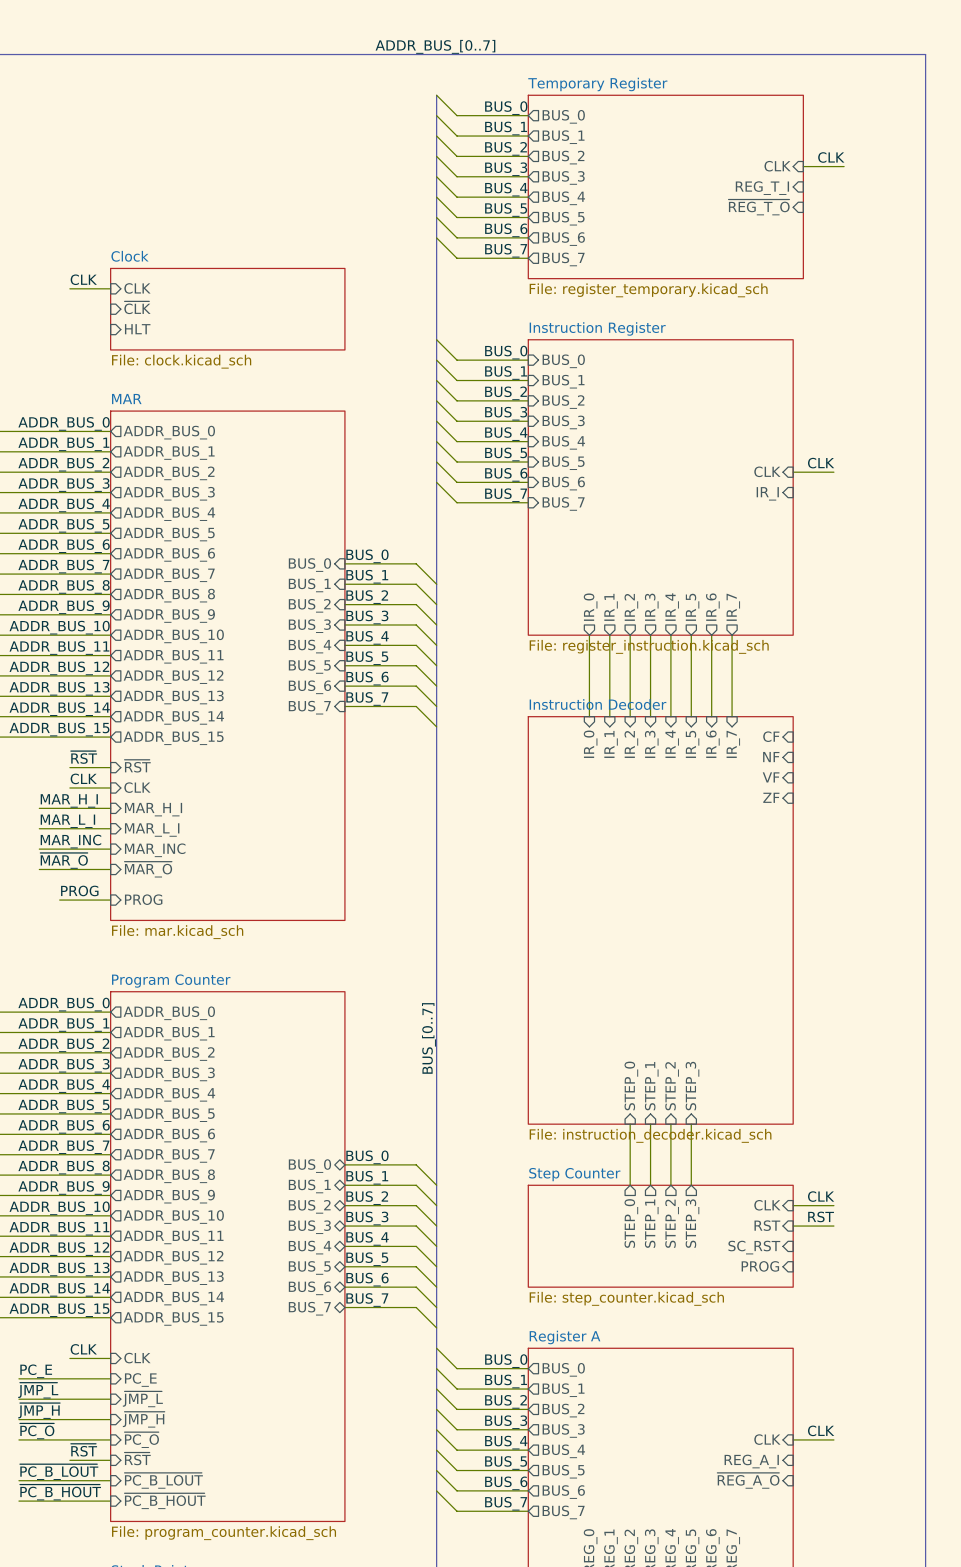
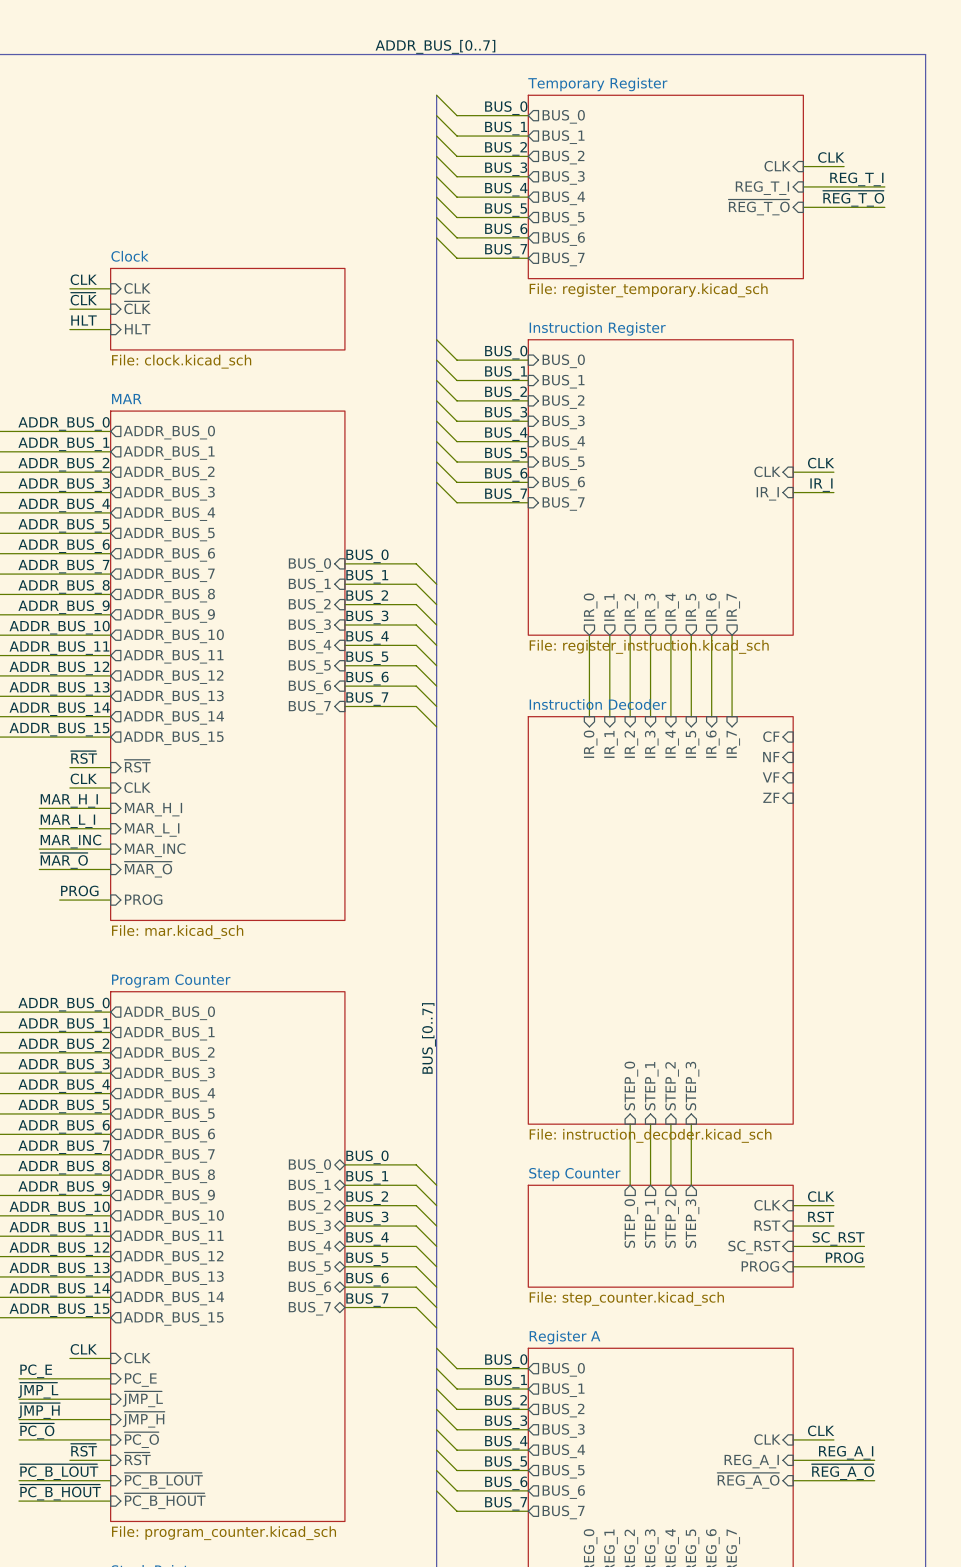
label: none -> REG_T_I (856, 179)
wire: none -> (803, 186) (884, 186)
label: none -> ~{REG_T_O} (853, 198)
wire: none -> (803, 207) (884, 207)
label: none -> ~{CLK} (83, 299)
wire: none -> (69, 309) (110, 309)
label: none -> HLT (84, 320)
wire: none -> (69, 329) (110, 329)
label: none -> IR_I (821, 485)
wire: none -> (793, 492) (833, 492)
label: none -> SC_RST (838, 1238)
wire: none -> (793, 1246) (864, 1246)
label: none -> PROG (844, 1257)
wire: none -> (793, 1266) (864, 1266)
label: none -> REG_A_I (846, 1452)
wire: none -> (793, 1460) (874, 1460)
label: none -> ~{REG_A_O} (842, 1472)
wire: none -> (793, 1480) (874, 1480)

